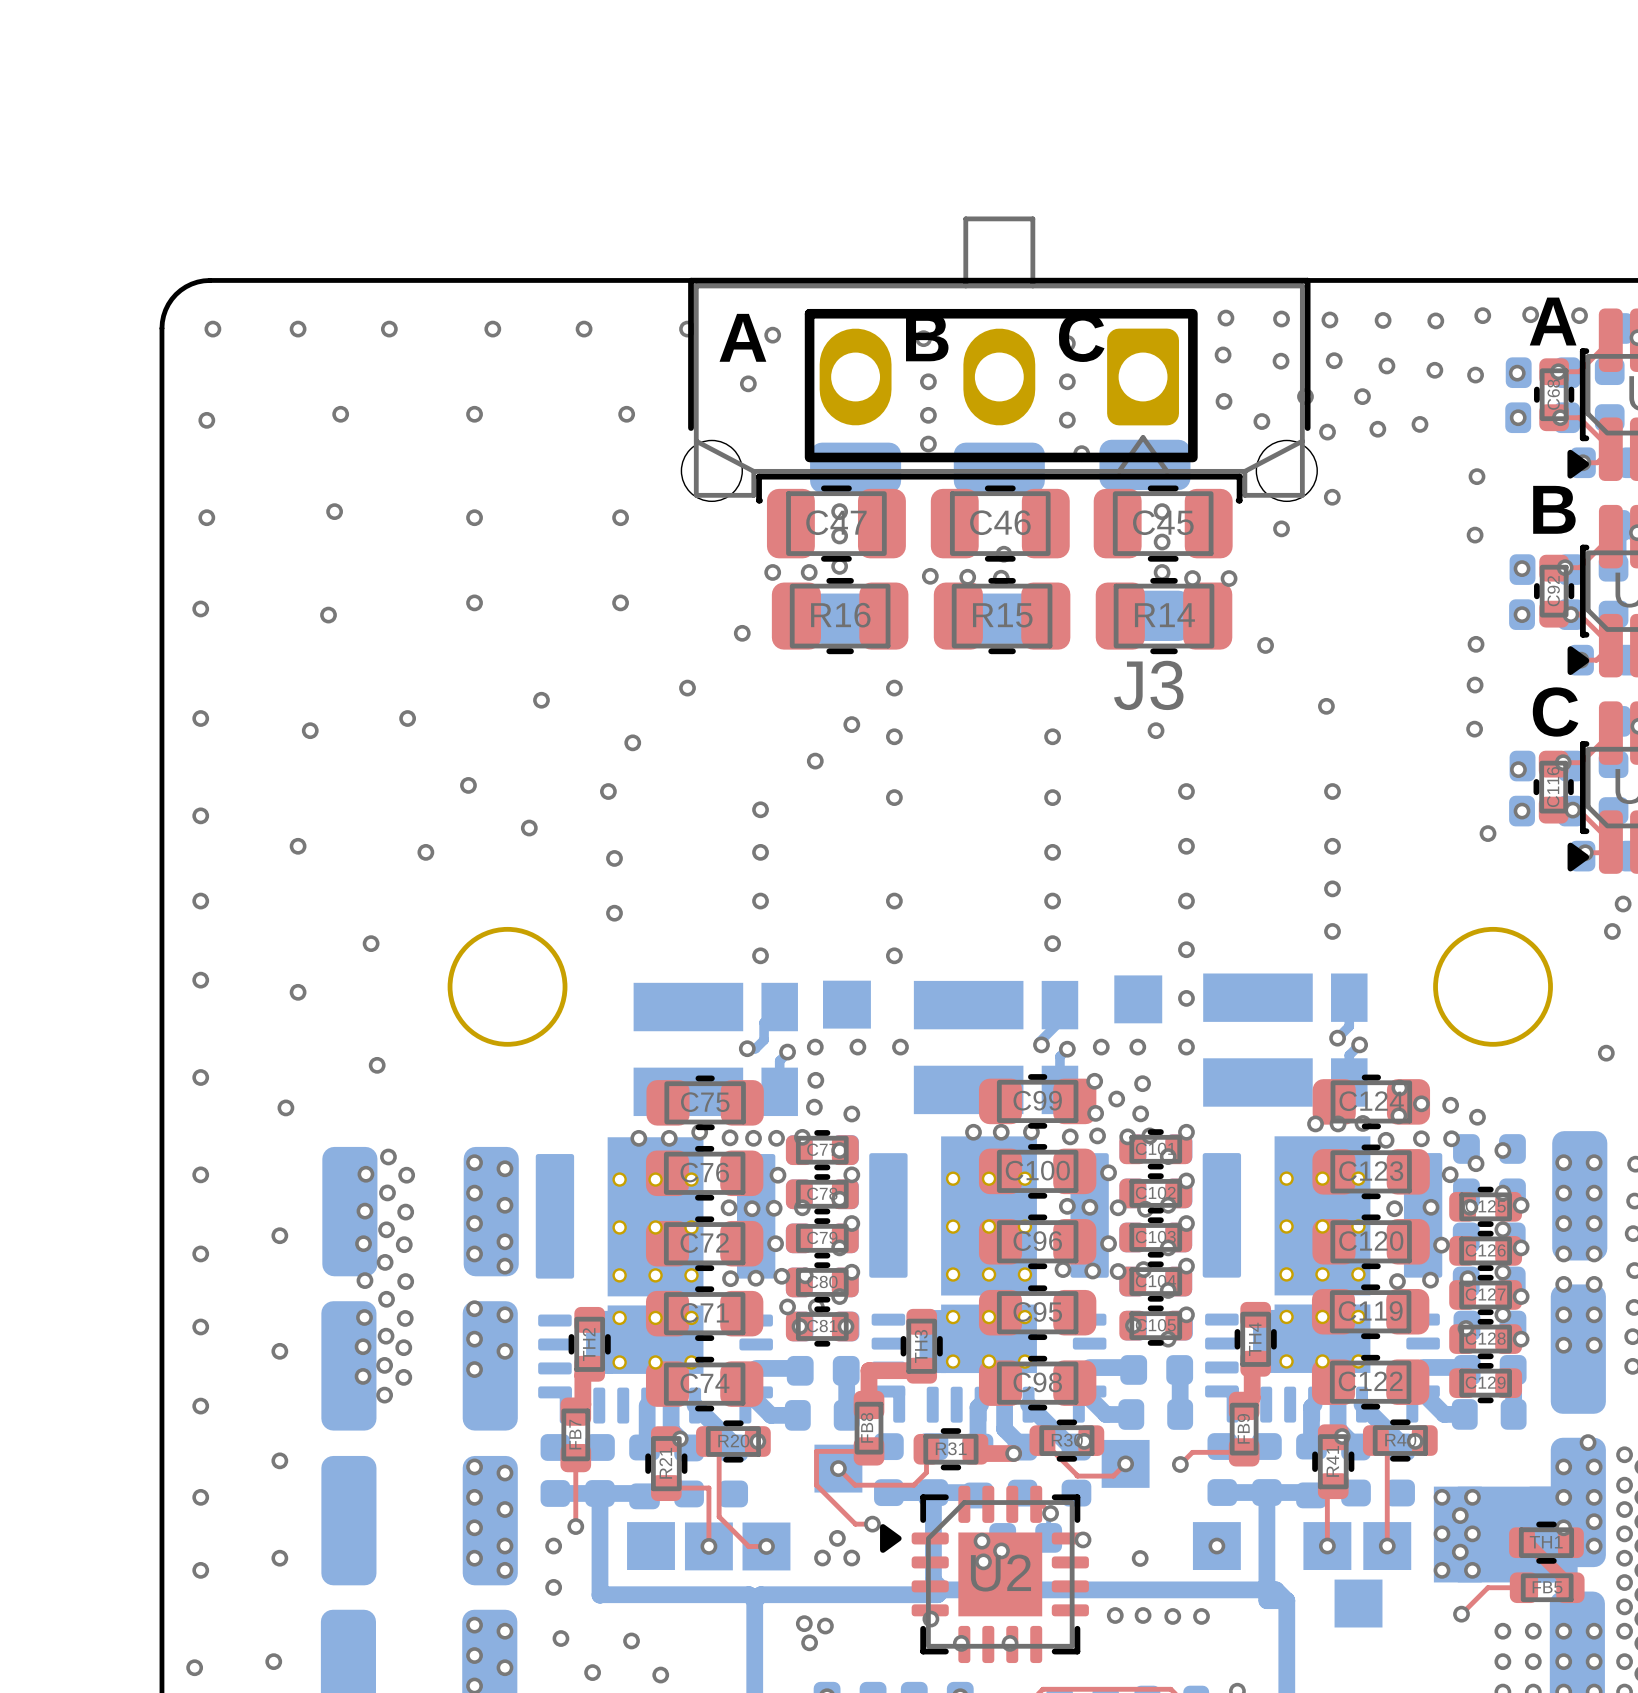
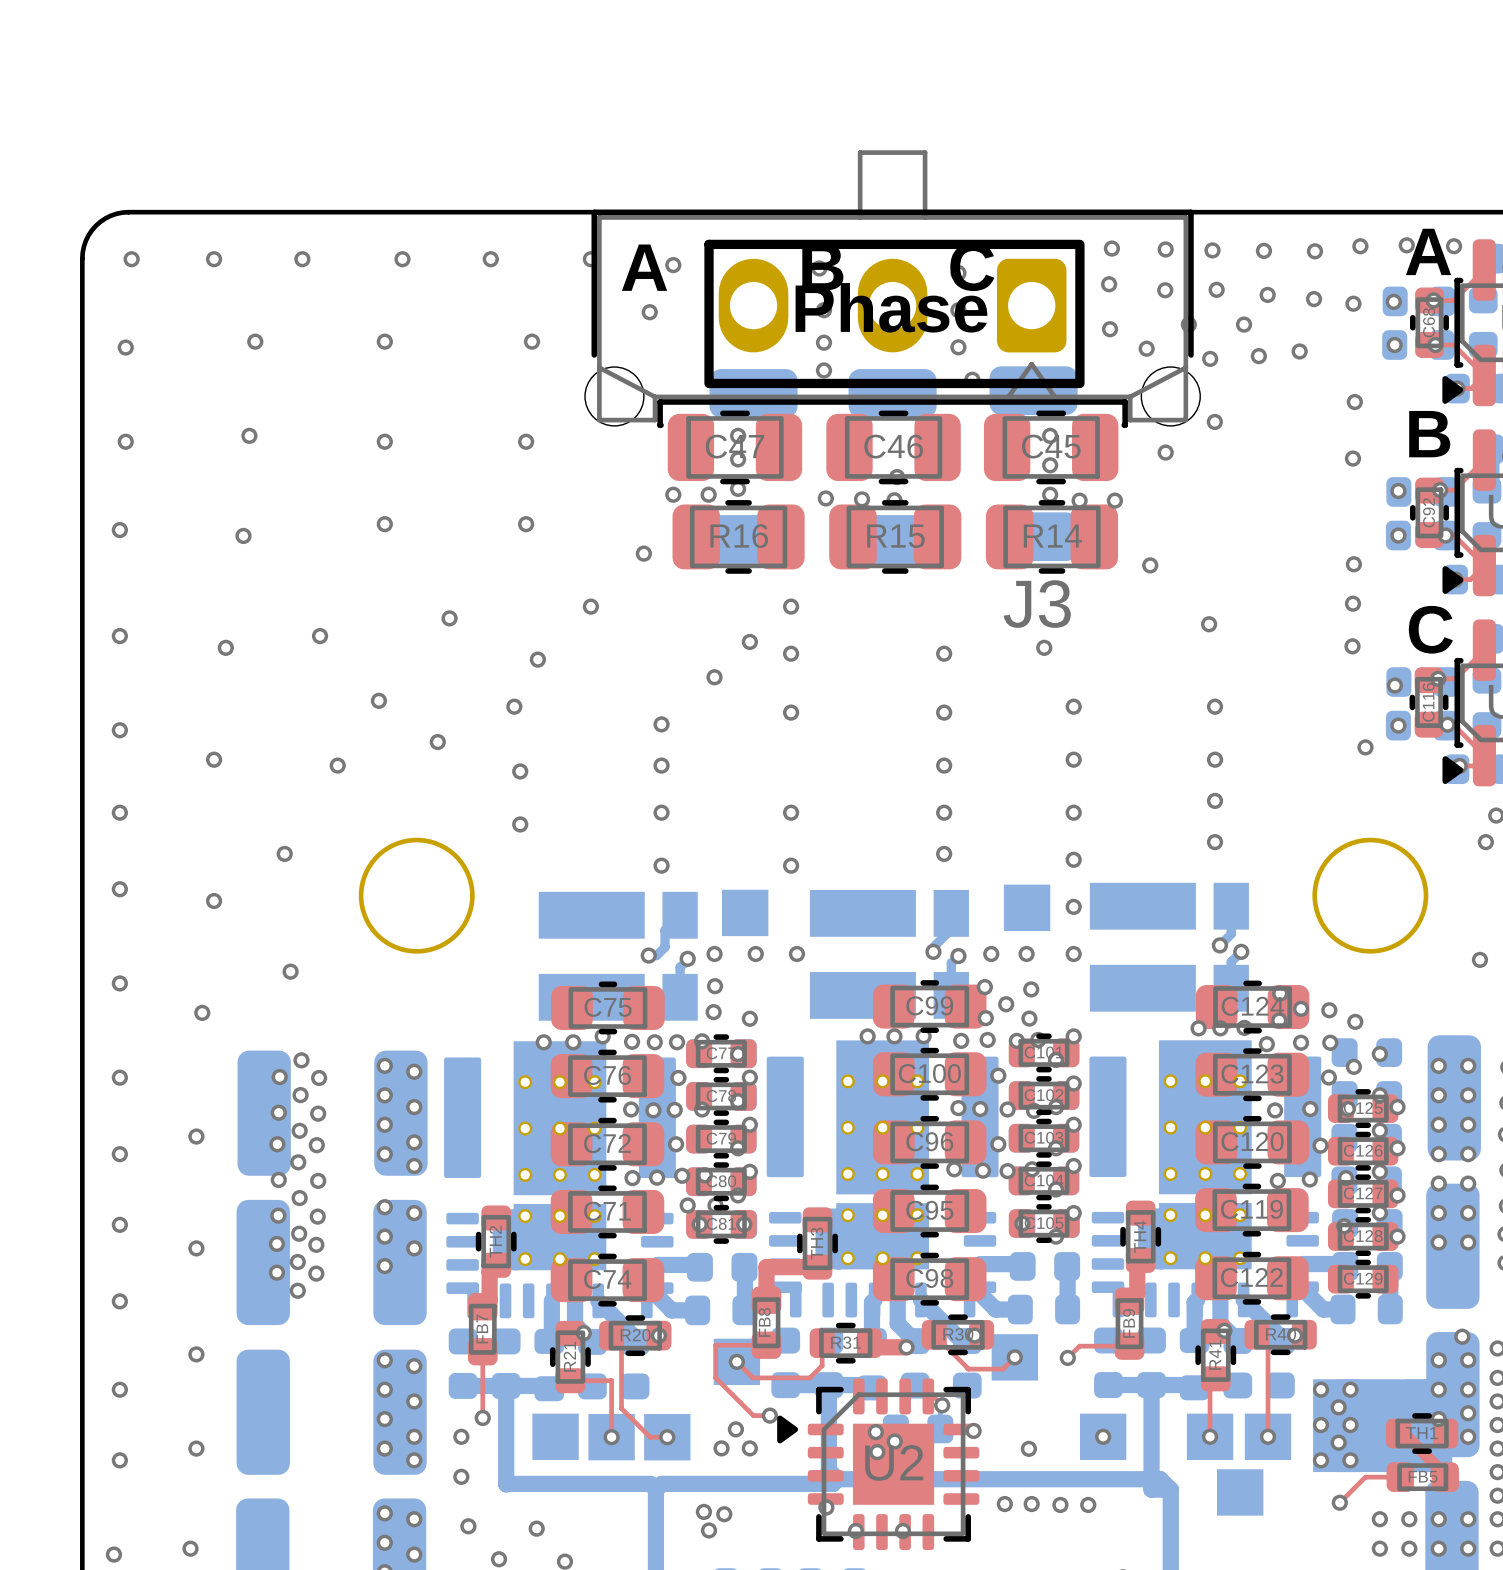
part text: none -> Phase (891, 307)

